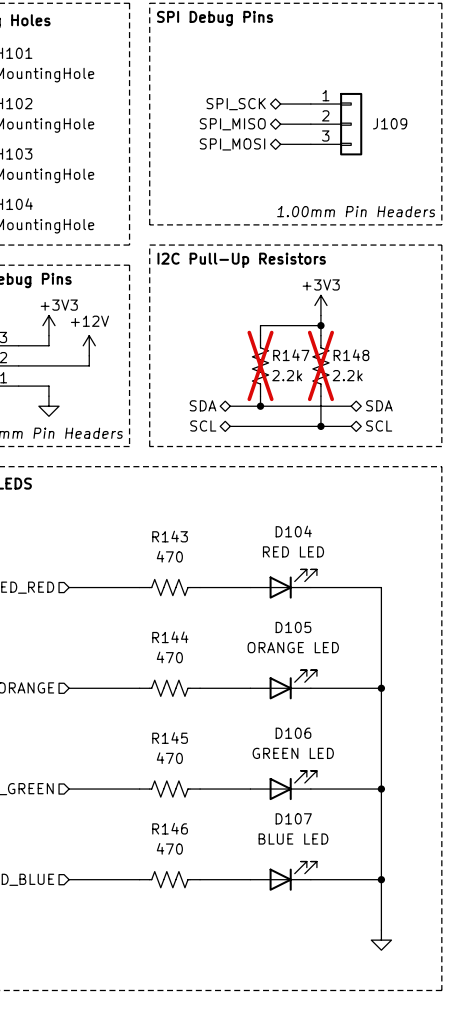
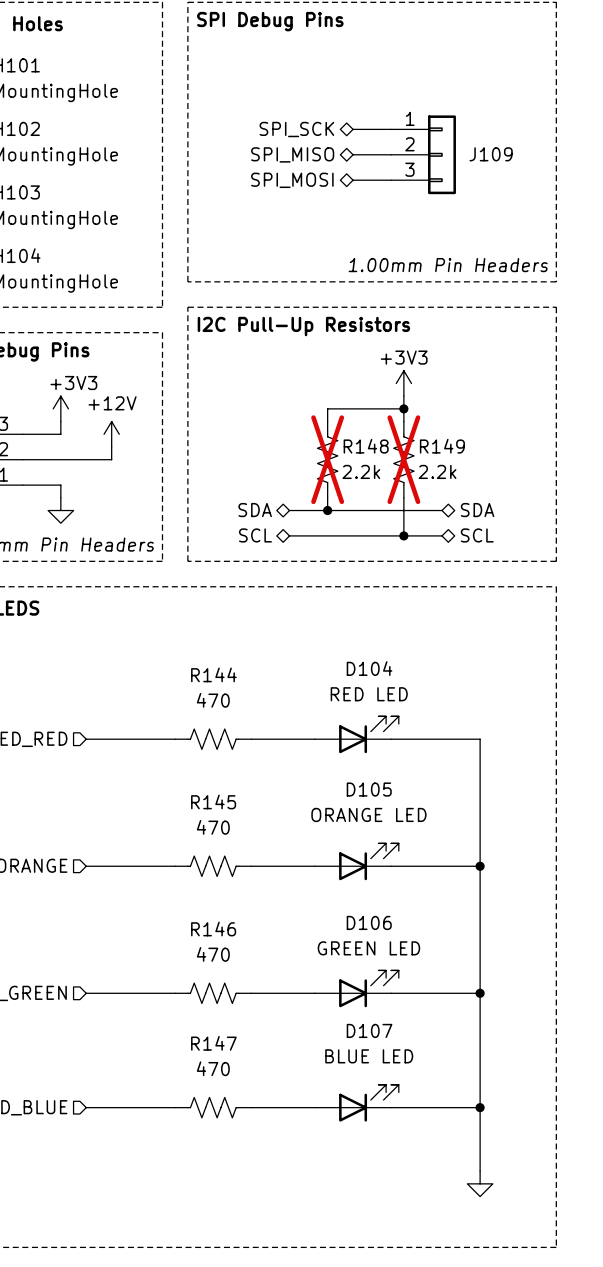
R147 name: R147 (291, 355) -> R148 (366, 446)
R148 name: R148 (351, 355) -> R149 (442, 446)
R143 name: R143 (170, 536) -> R144 (213, 674)
R144 name: R144 (170, 637) -> R145 (213, 801)
R145 name: R145 (170, 738) -> R146 (213, 929)
R146 name: R146 (170, 828) -> R147 (213, 1043)

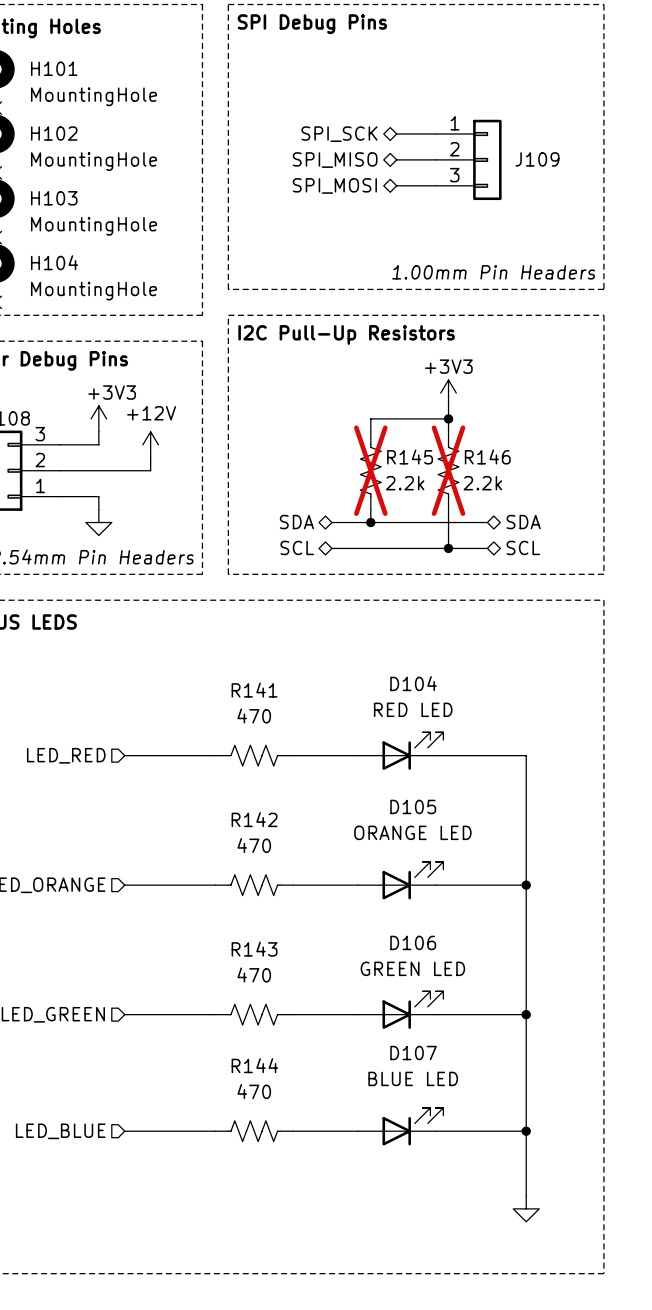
R148 name: R148 (366, 446) -> R145 (410, 456)
R149 name: R149 (442, 446) -> R146 (487, 456)
R144 name: R144 (213, 674) -> R141 (254, 690)
R145 name: R145 (213, 801) -> R142 (254, 819)
R146 name: R146 (213, 929) -> R143 (254, 949)
R147 name: R147 (213, 1043) -> R144 (254, 1065)

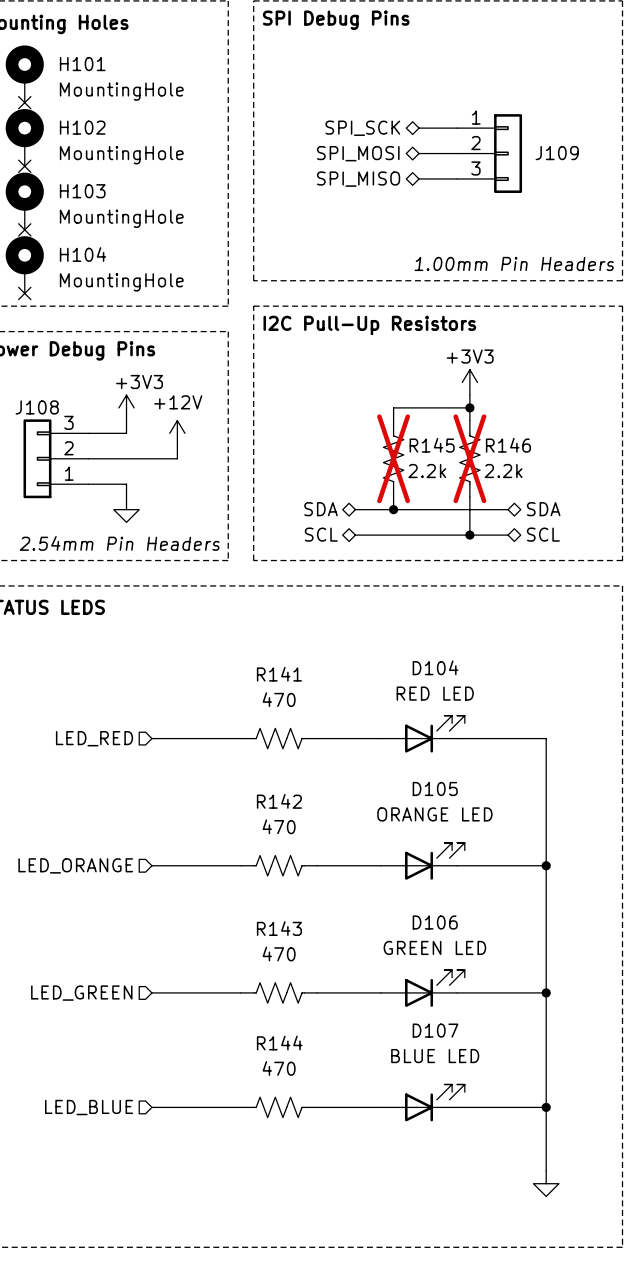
hierarchical label: SPI_MISO (335, 160) -> SPI_MOSI (358, 153)
hierarchical label: SPI_MOSI (334, 185) -> SPI_MISO (358, 179)

